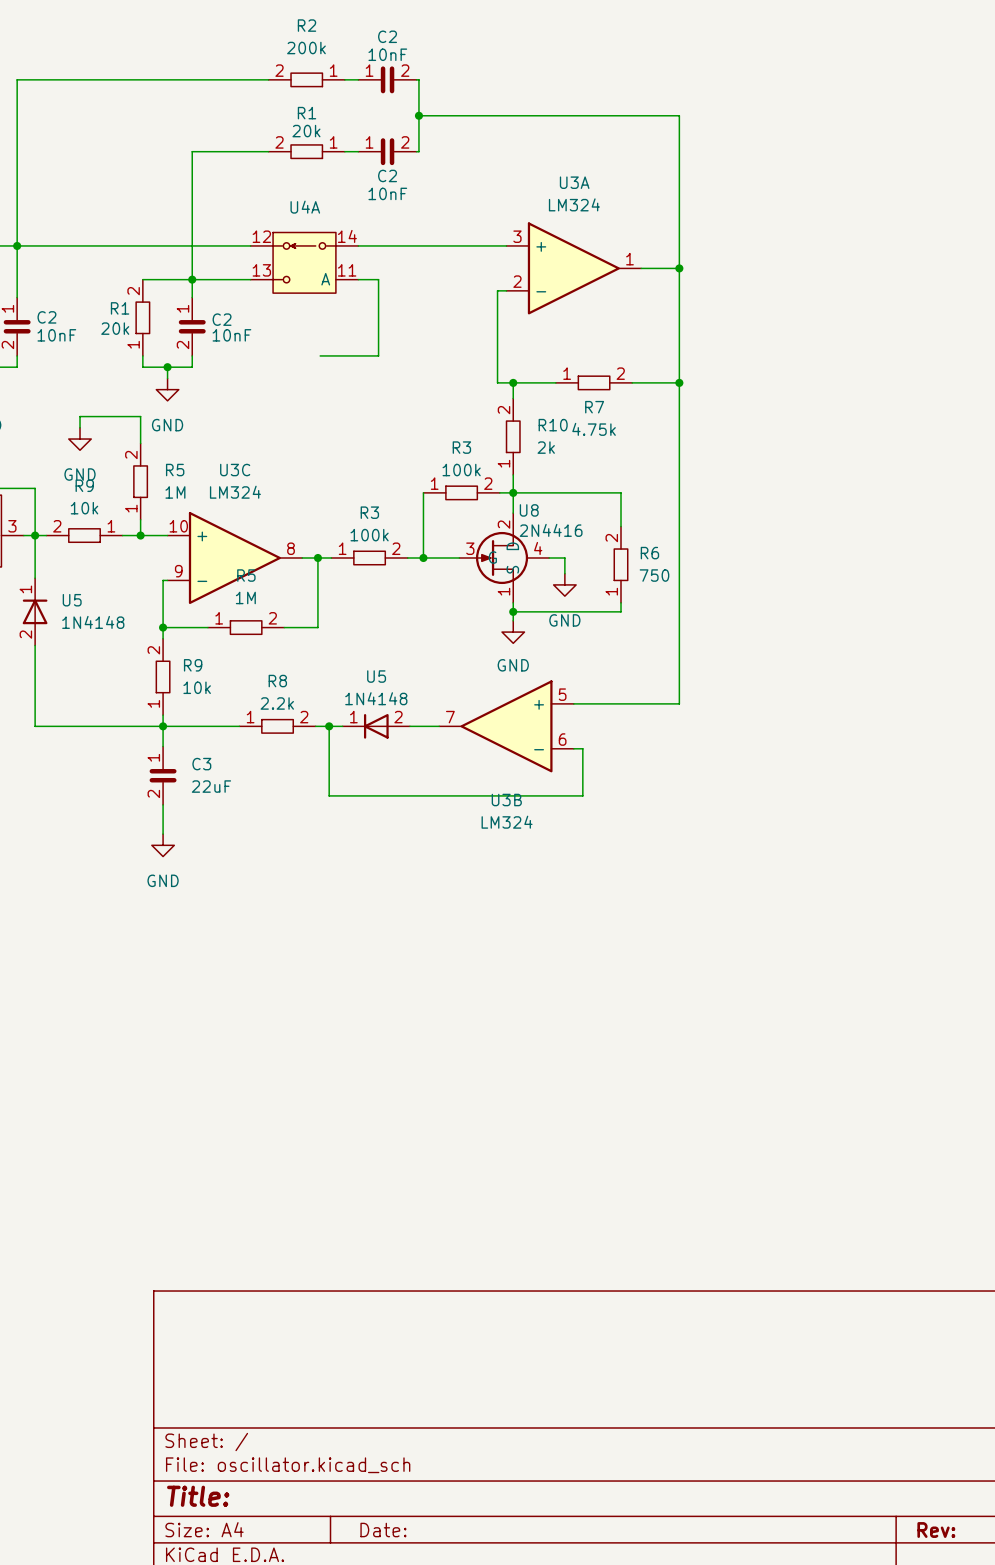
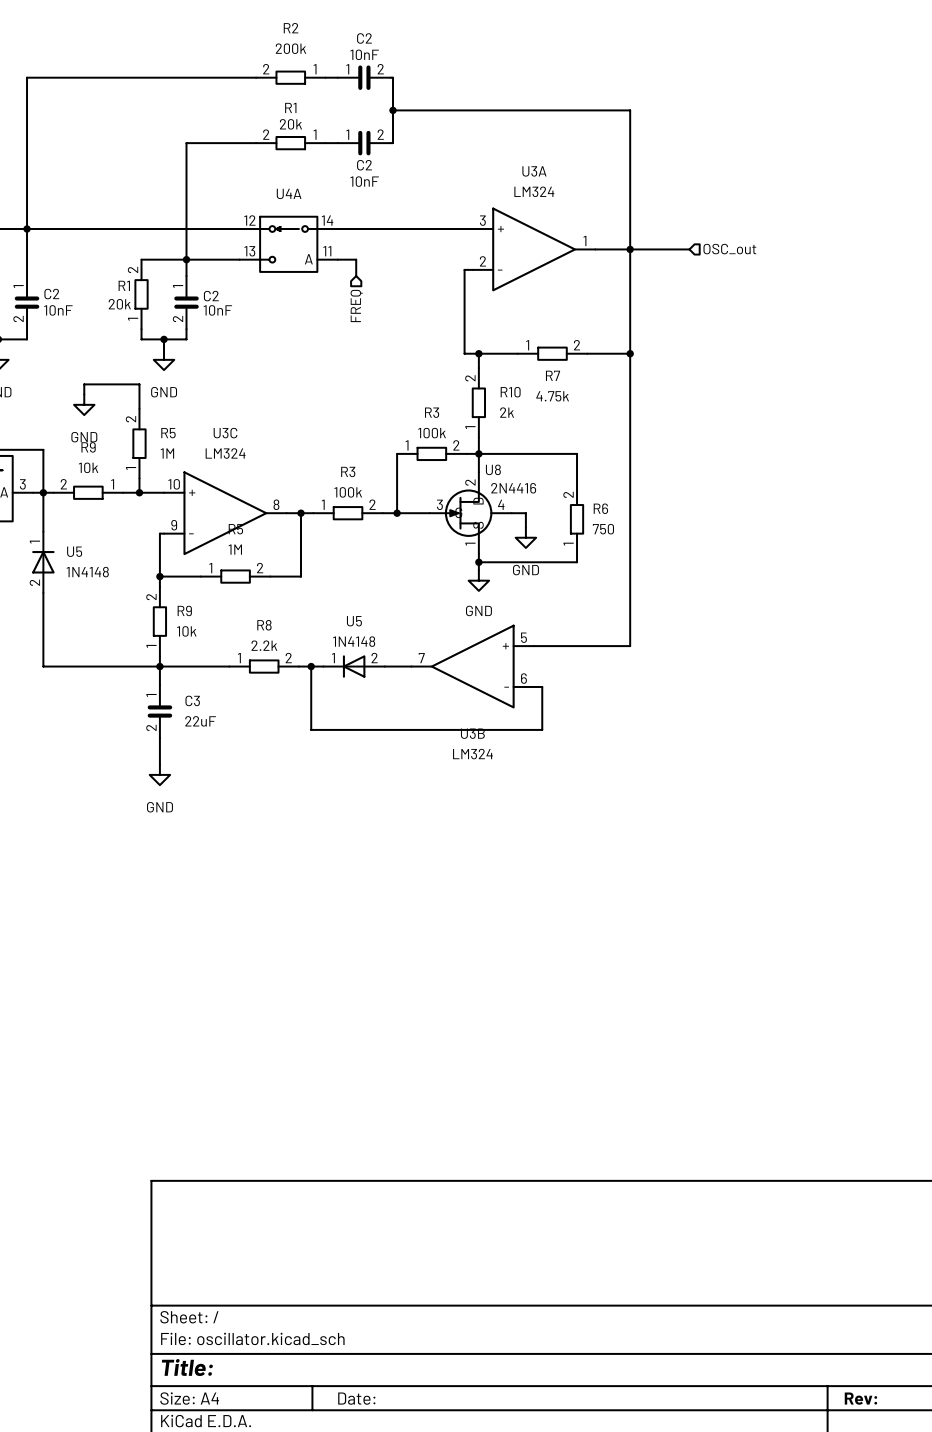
wire: none -> (630, 249) (689, 249)
hierarchical label: none -> OSC_out (729, 249)
wire: (378, 297) (378, 355) (320, 355) -> none
hierarchical label: none -> FREQ (356, 305)

